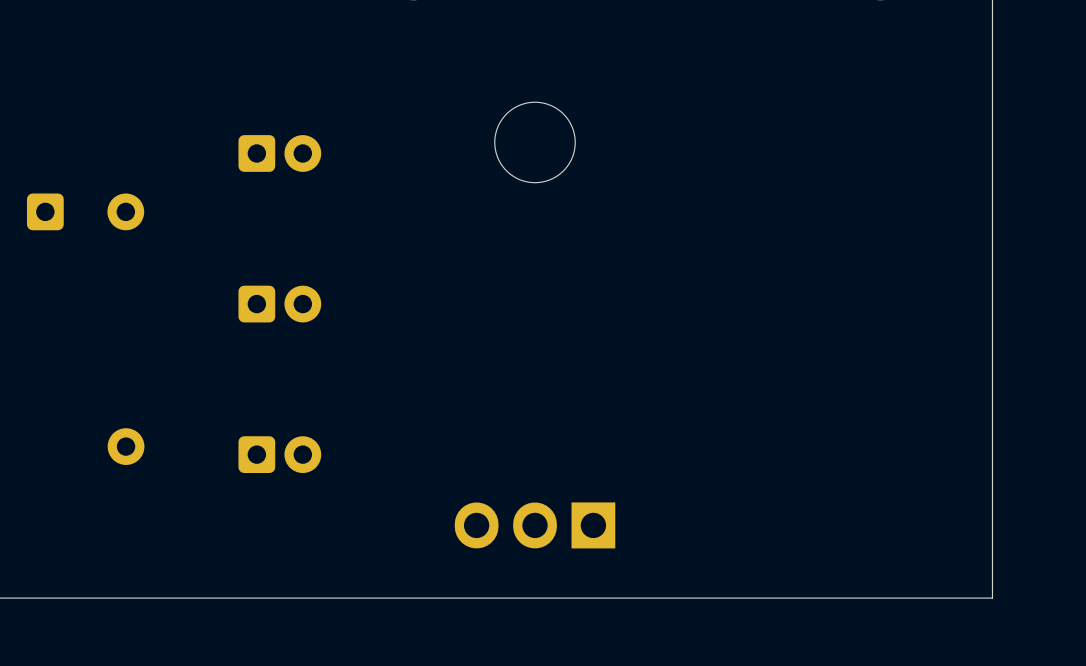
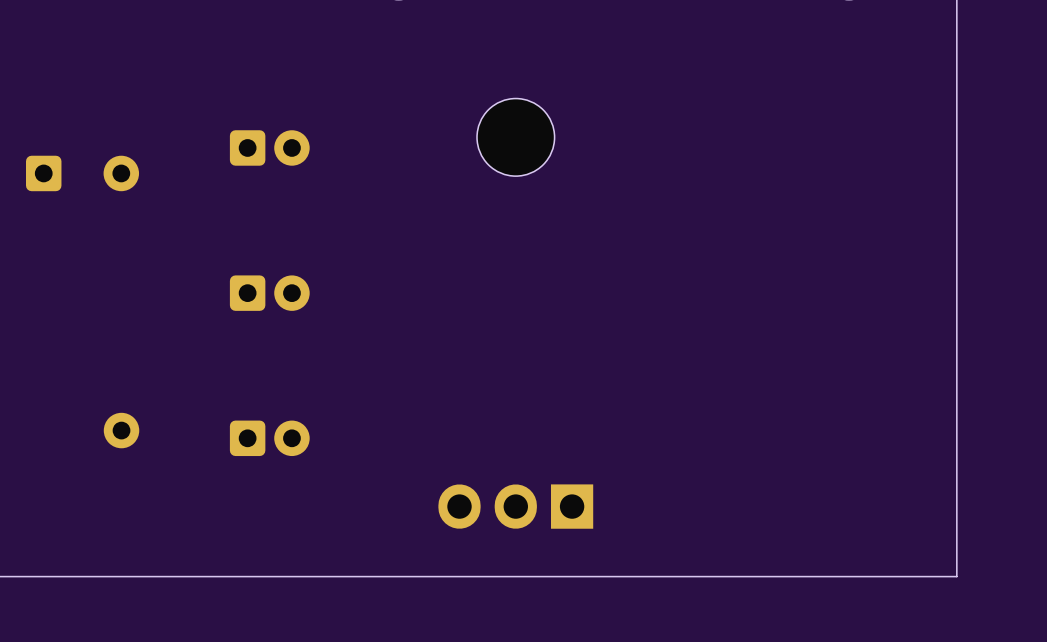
part position: (85, 211) -> (82, 173)

